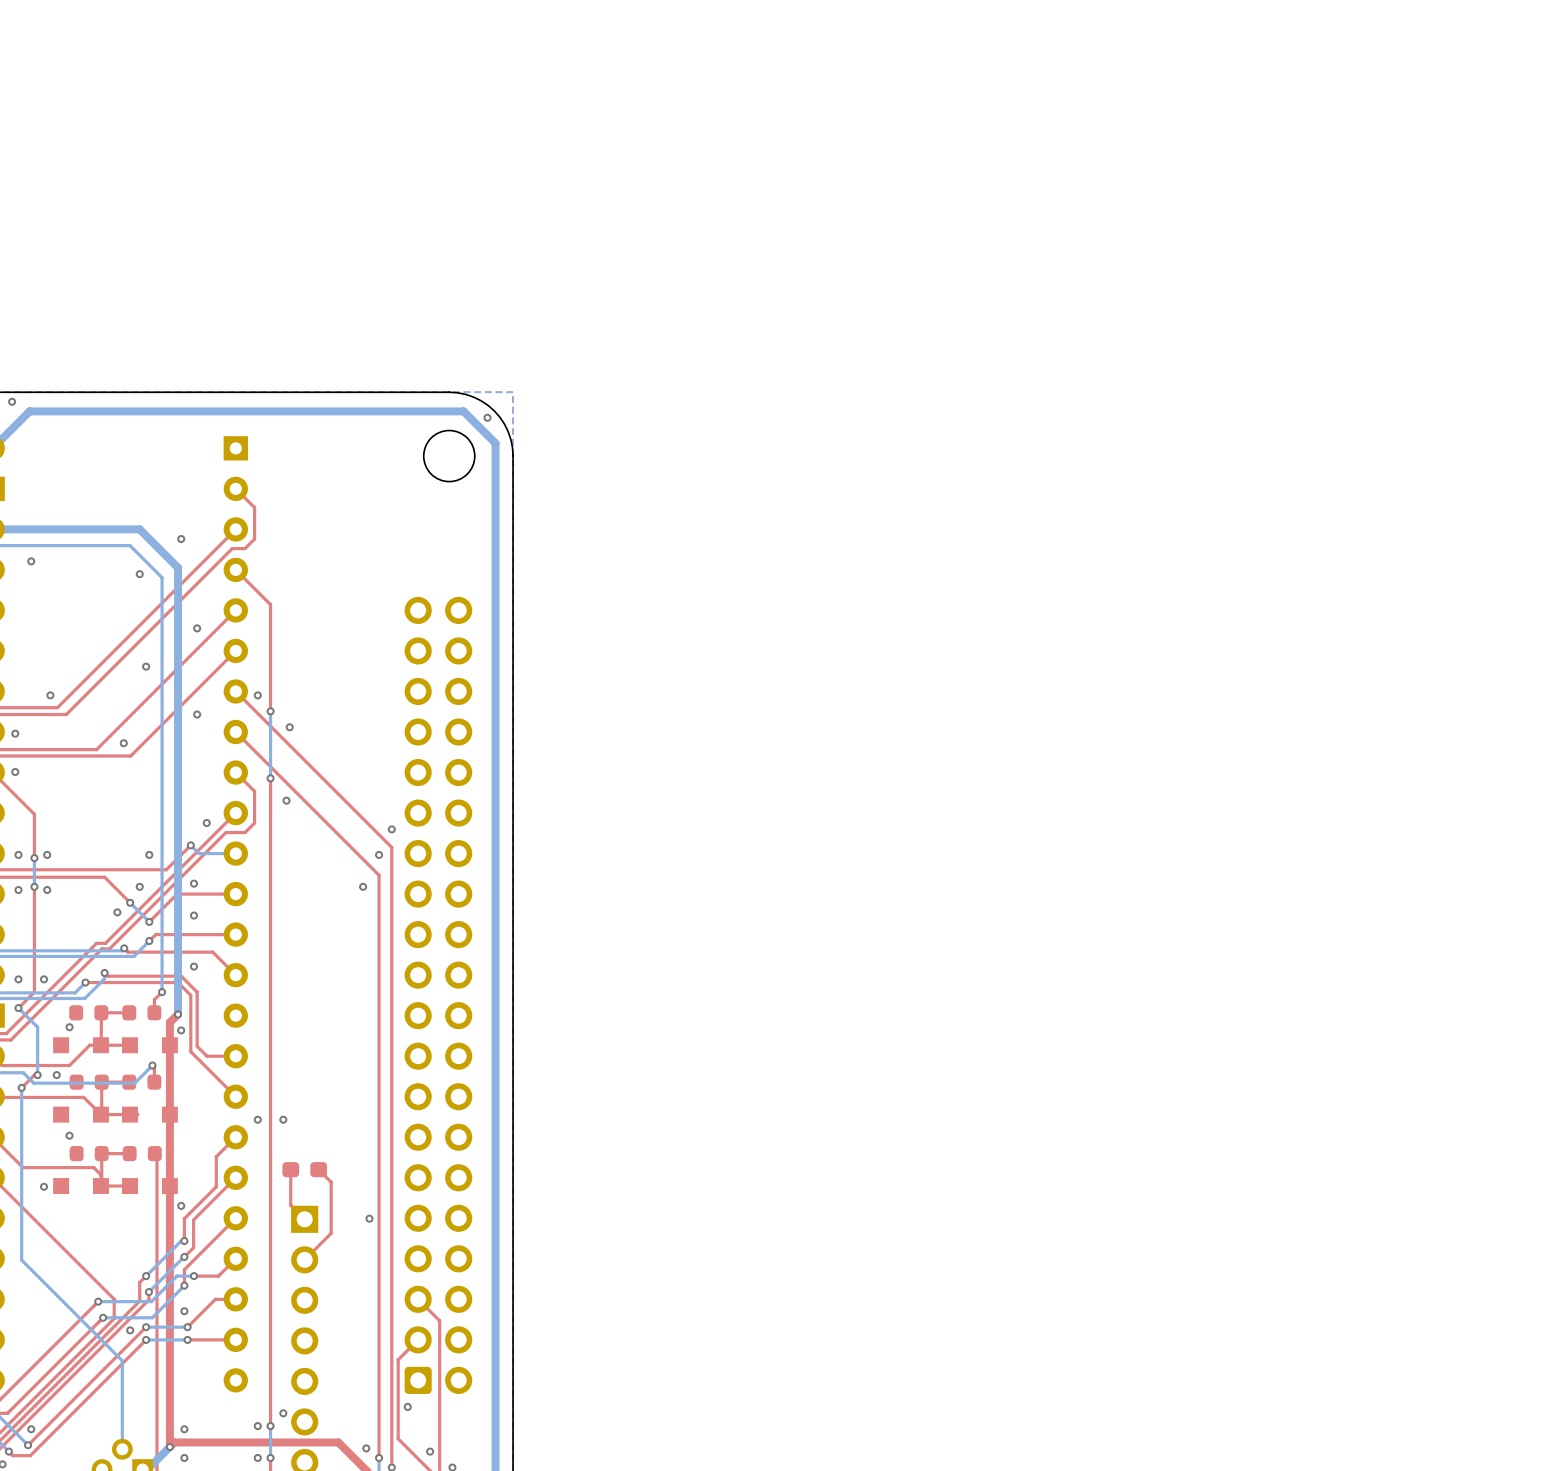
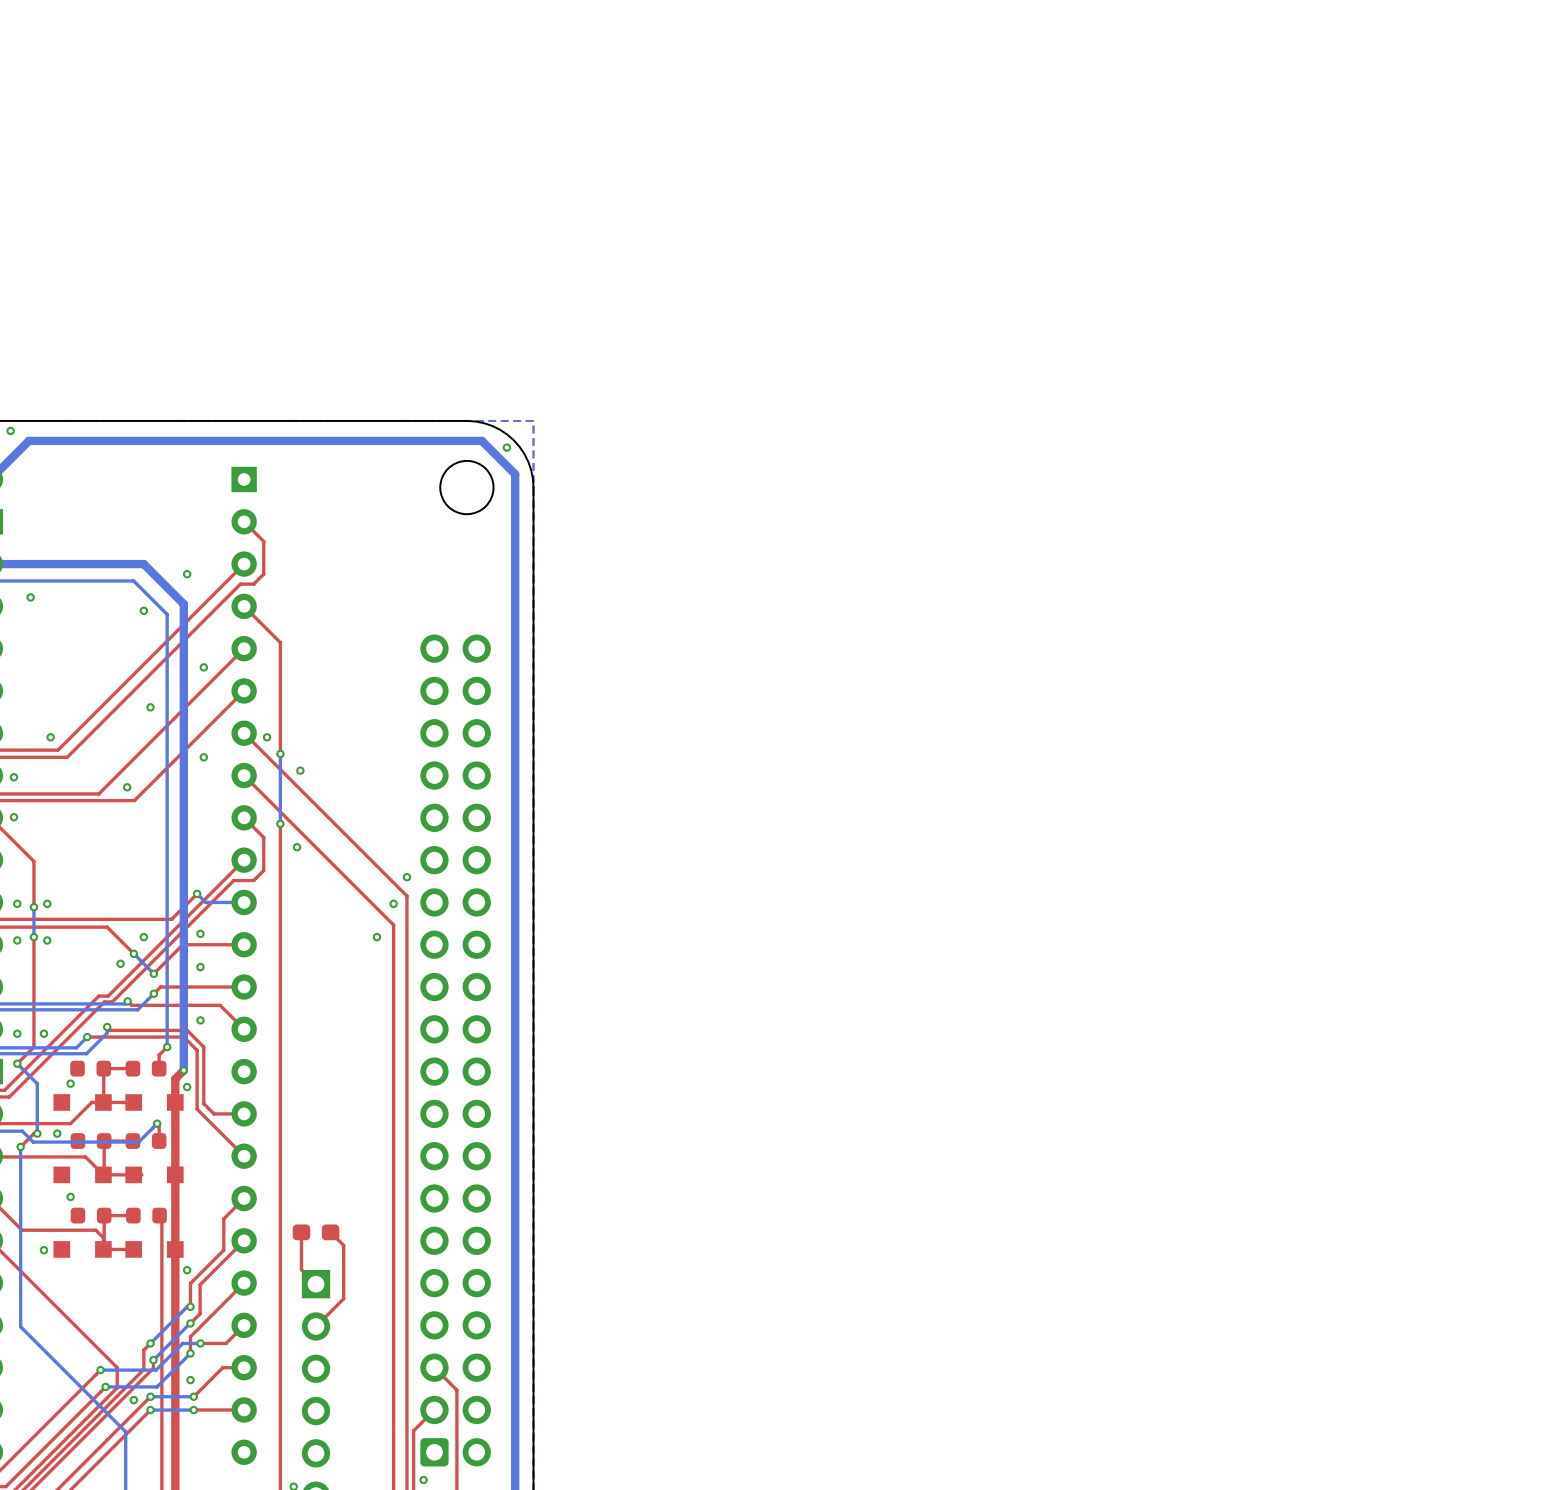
via: (206, 823) -> none
via: (149, 854) -> none
via: (257, 1119) -> none
via: (283, 1119) -> none
via: (369, 1218) -> none

